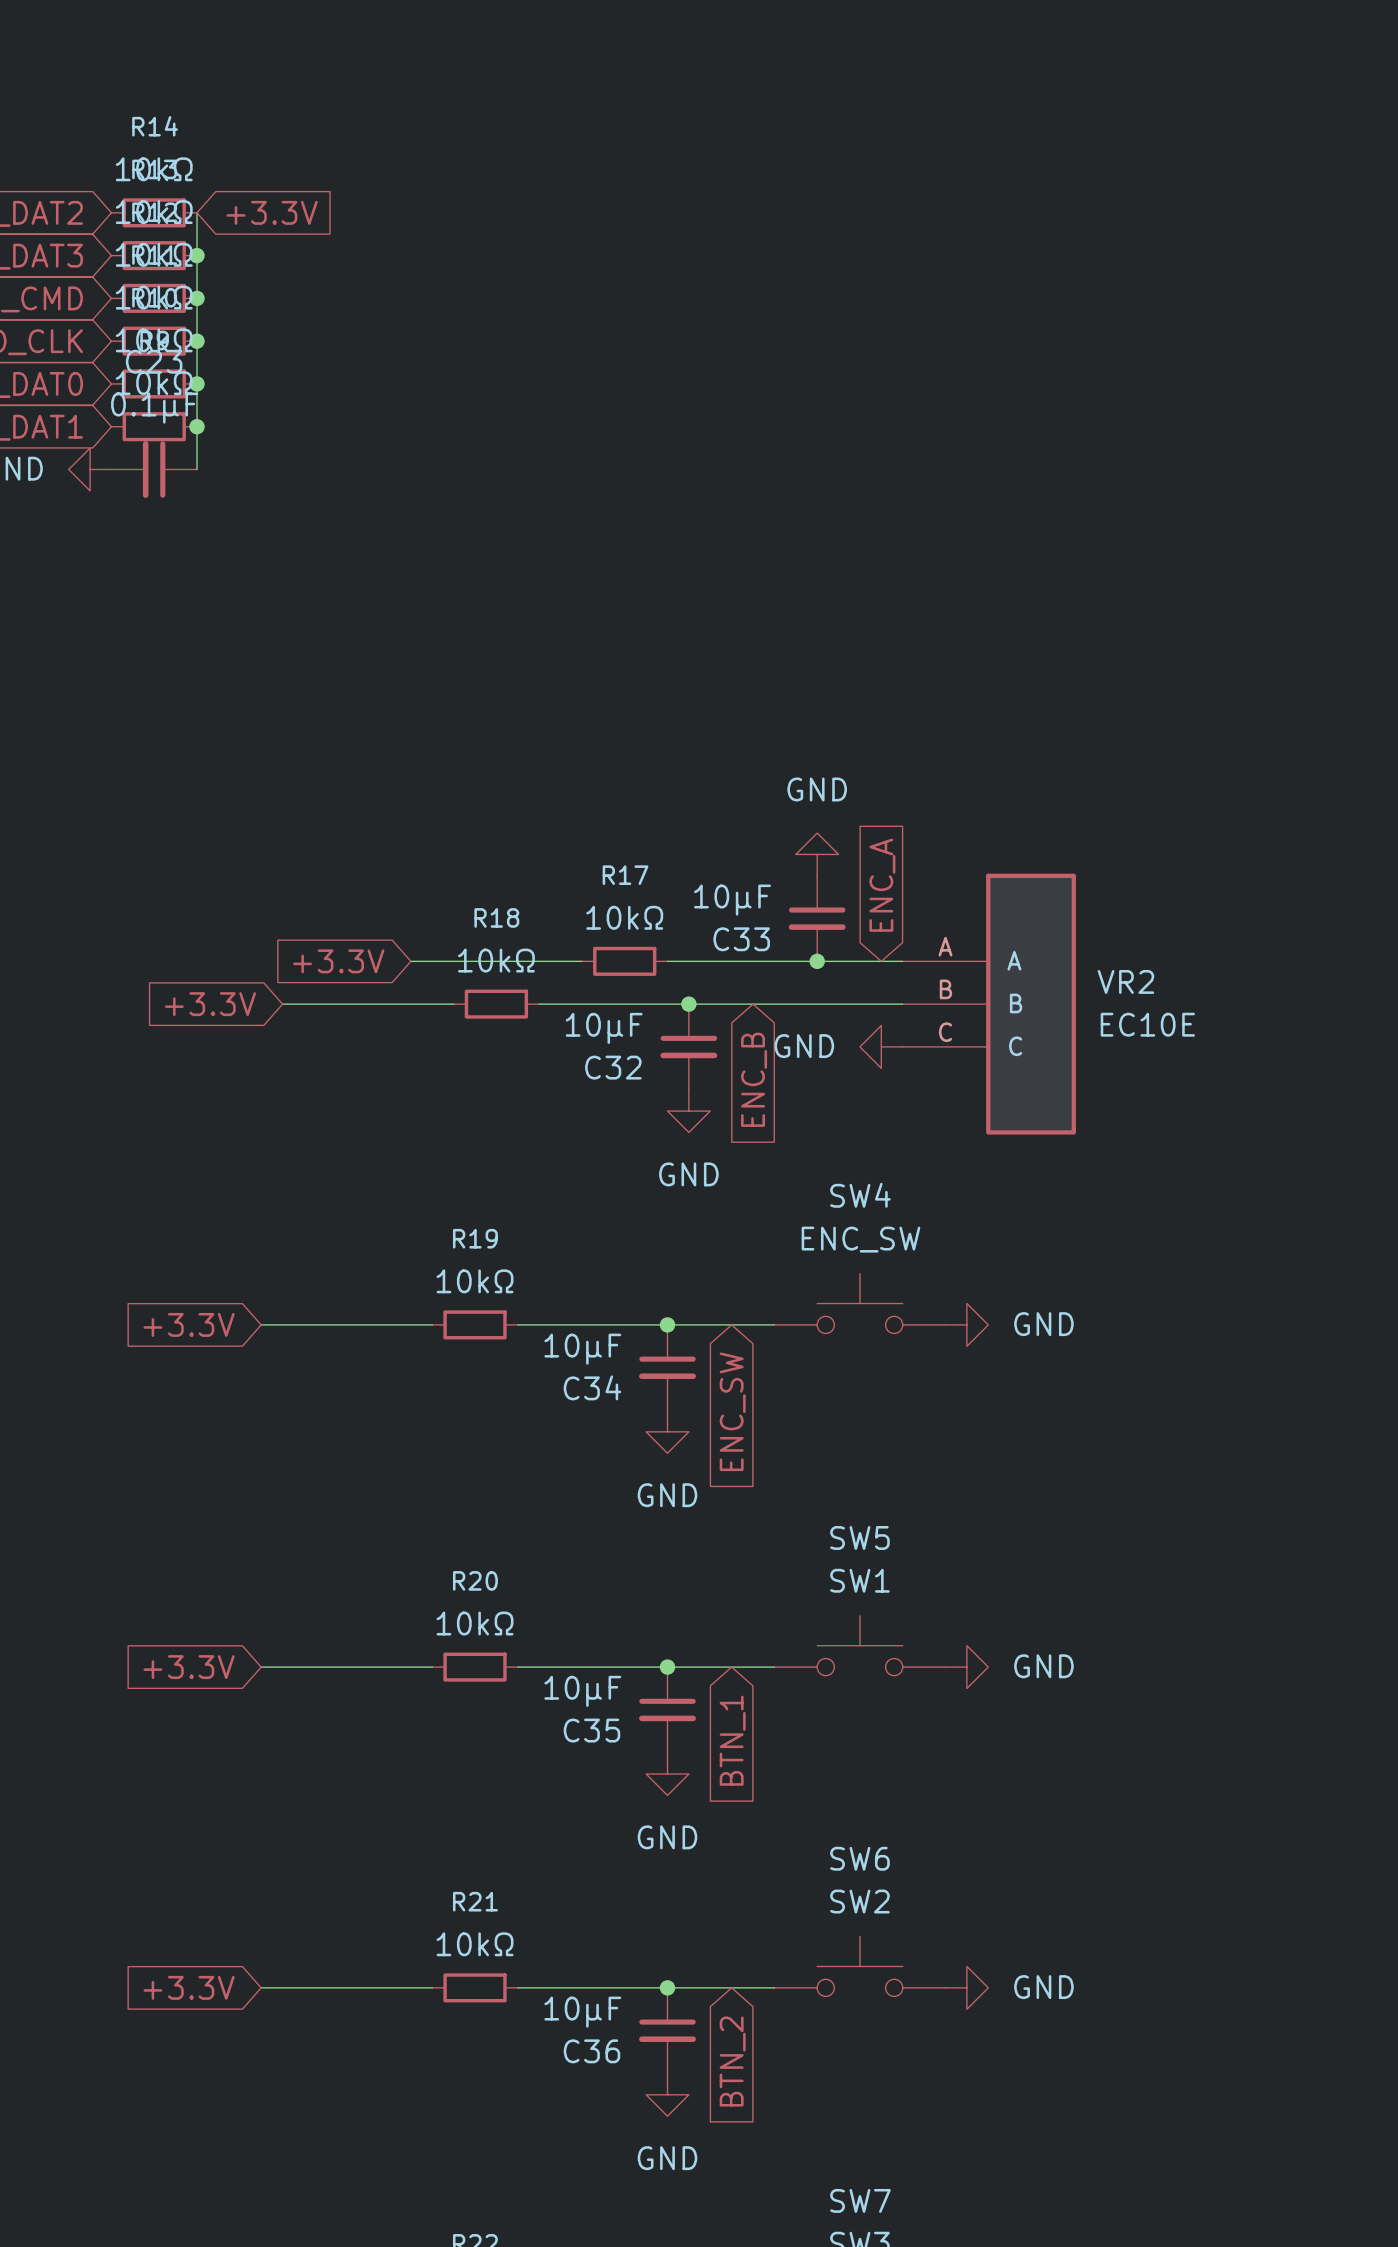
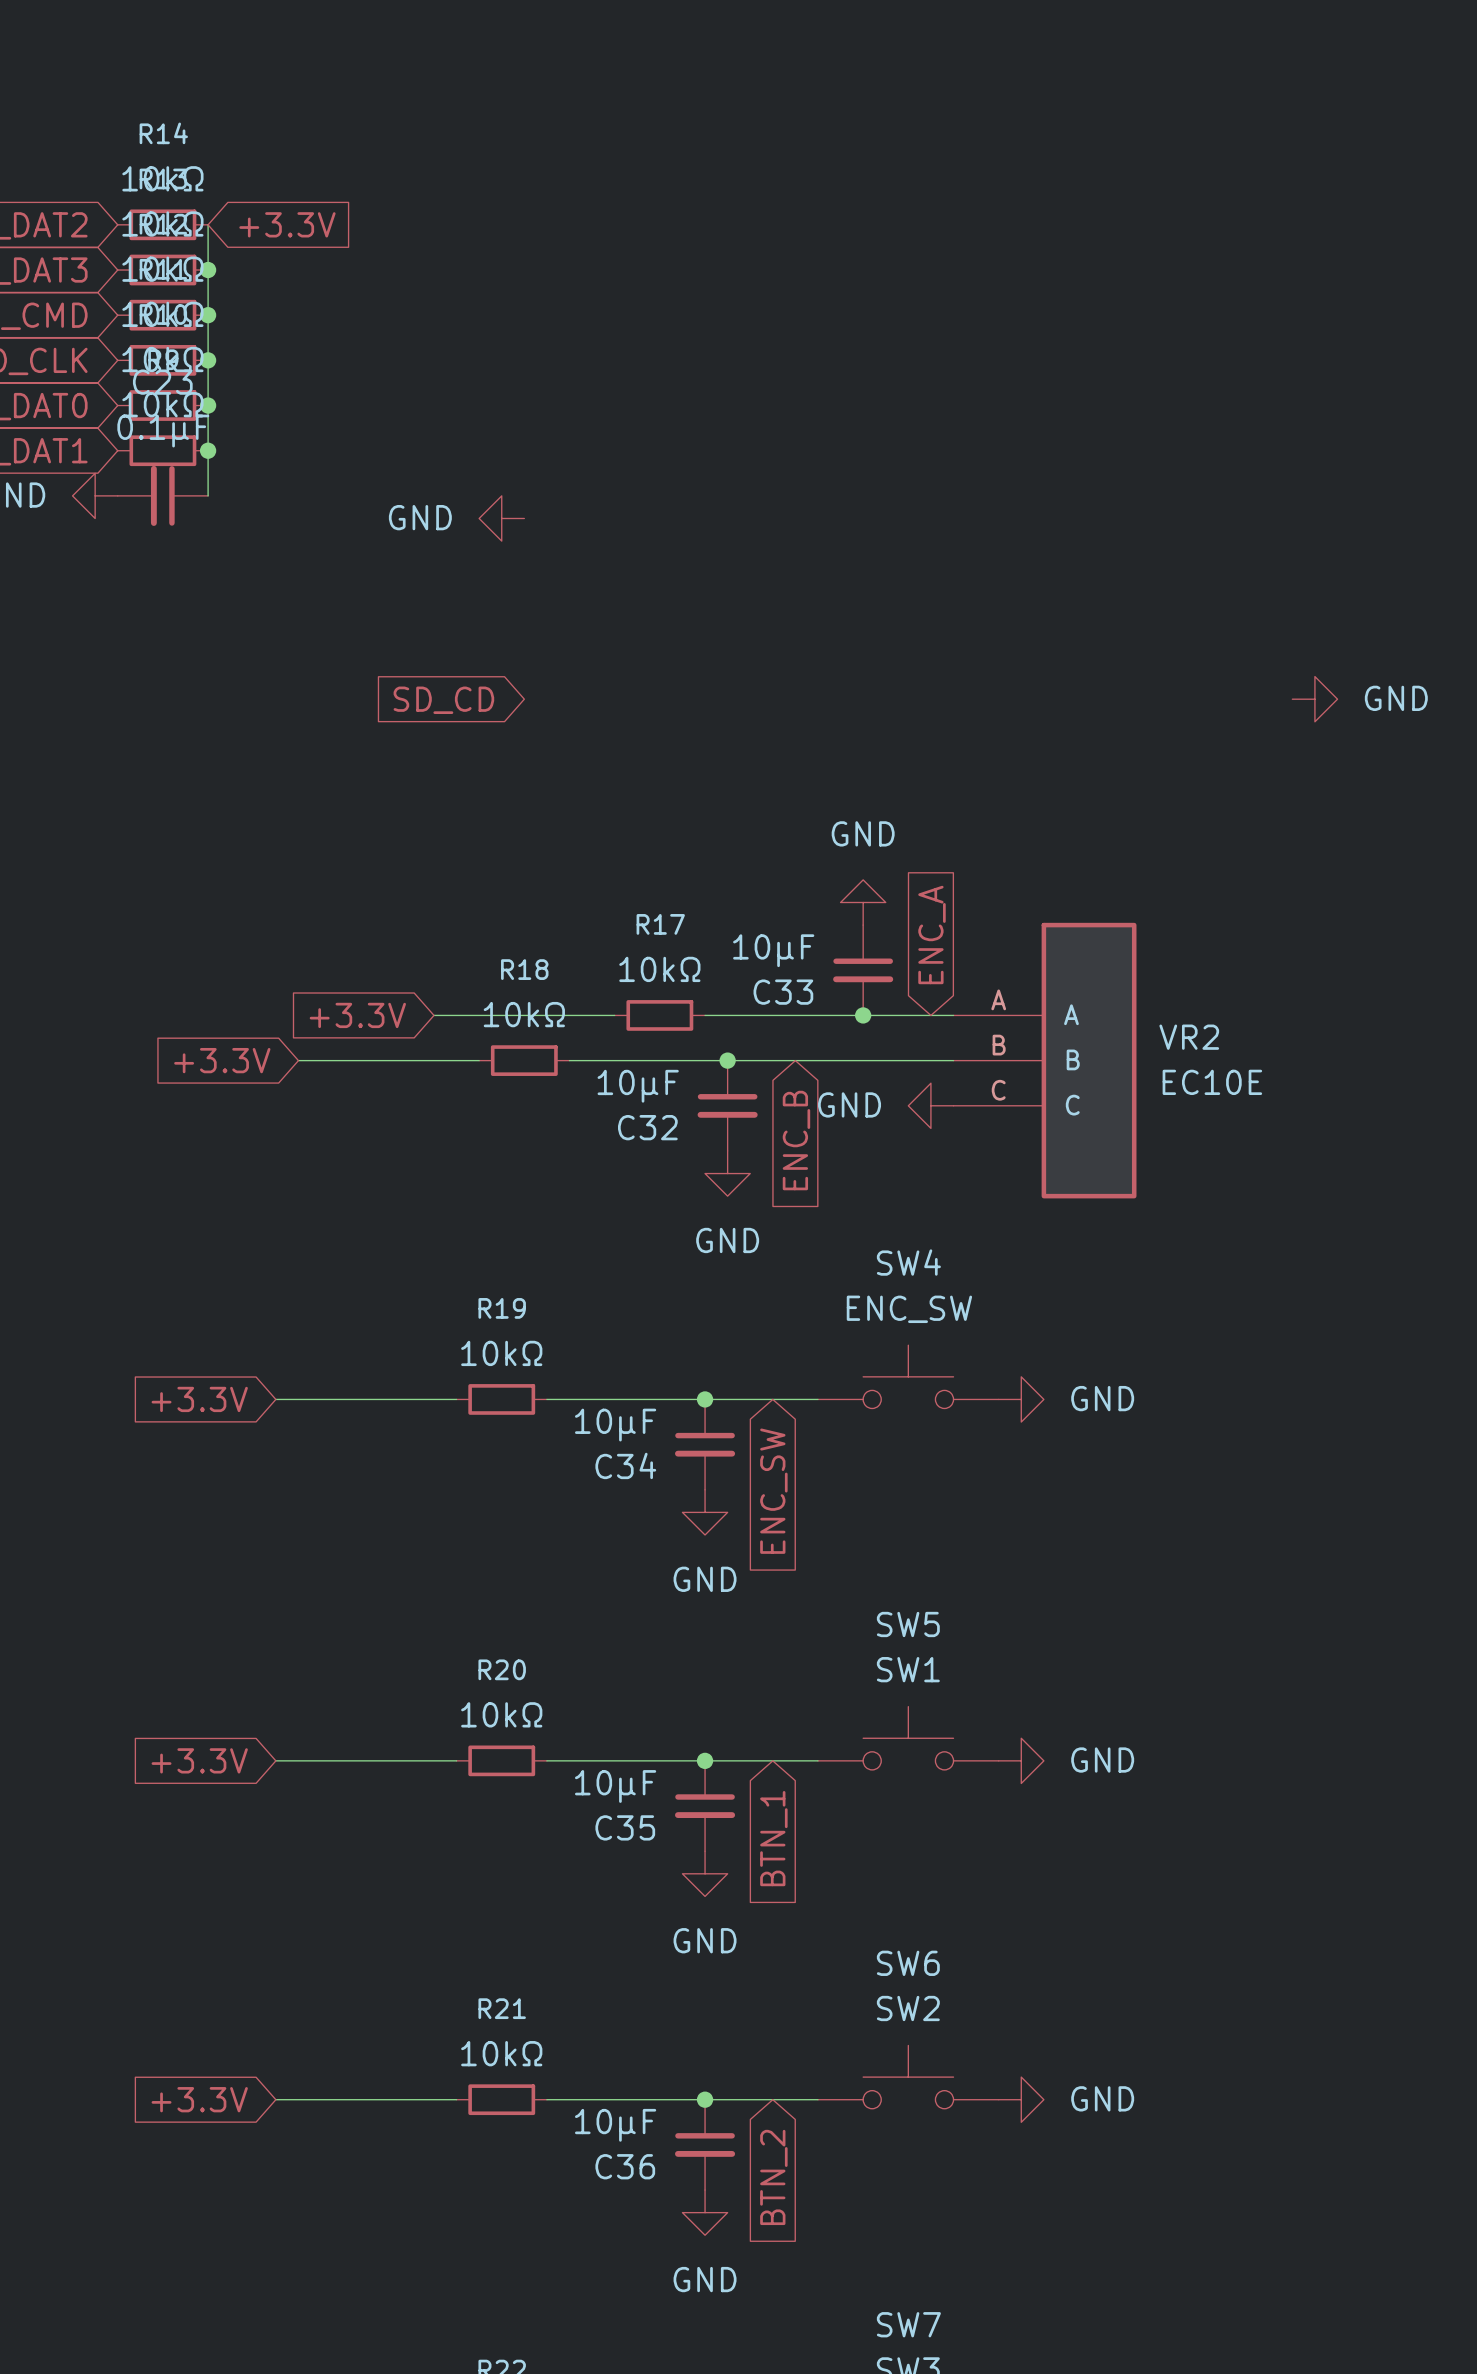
power symbol: none -> GND (501, 518)
power symbol: none -> GND (1314, 699)
global label: none -> SD_CD (443, 700)

